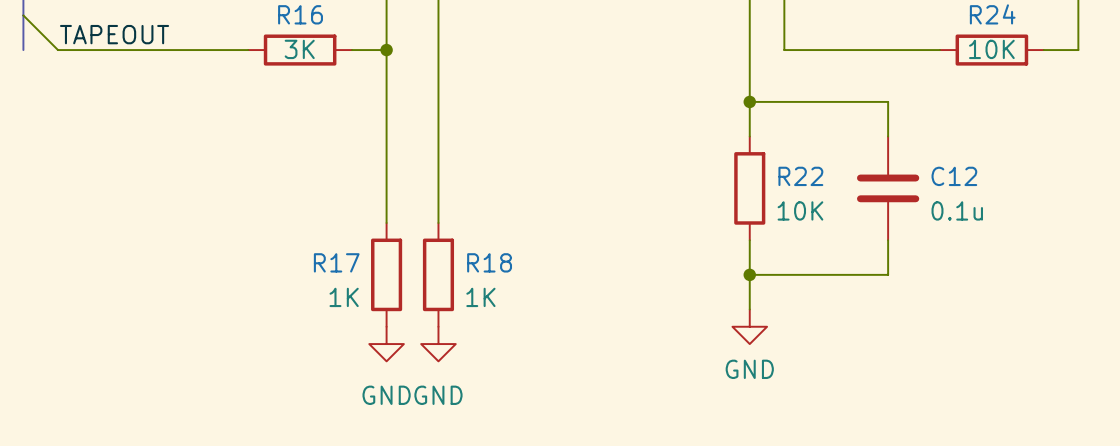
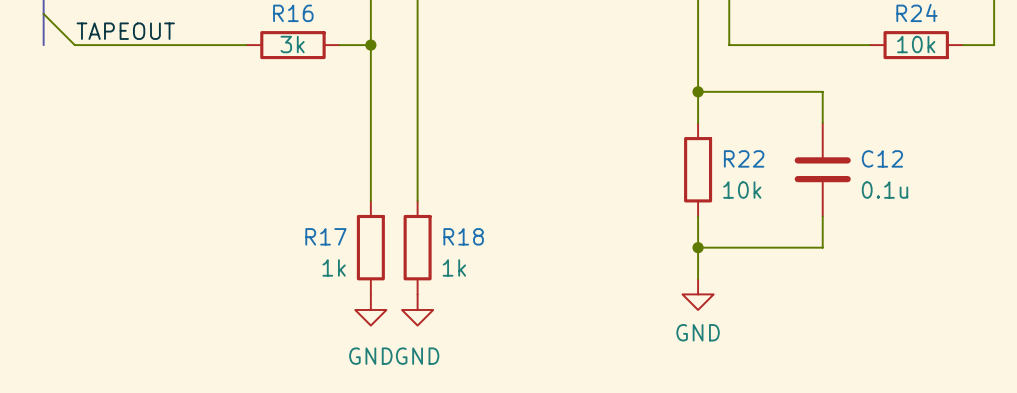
R16 value: 3K (299, 49) -> 3k (292, 44)
R24 value: 10K (991, 49) -> 10k (916, 44)
R22 value: 10K (800, 210) -> 10k (742, 190)
R17 value: 1K (344, 297) -> 1k (334, 267)
R18 value: 1K (480, 297) -> 1k (454, 267)

